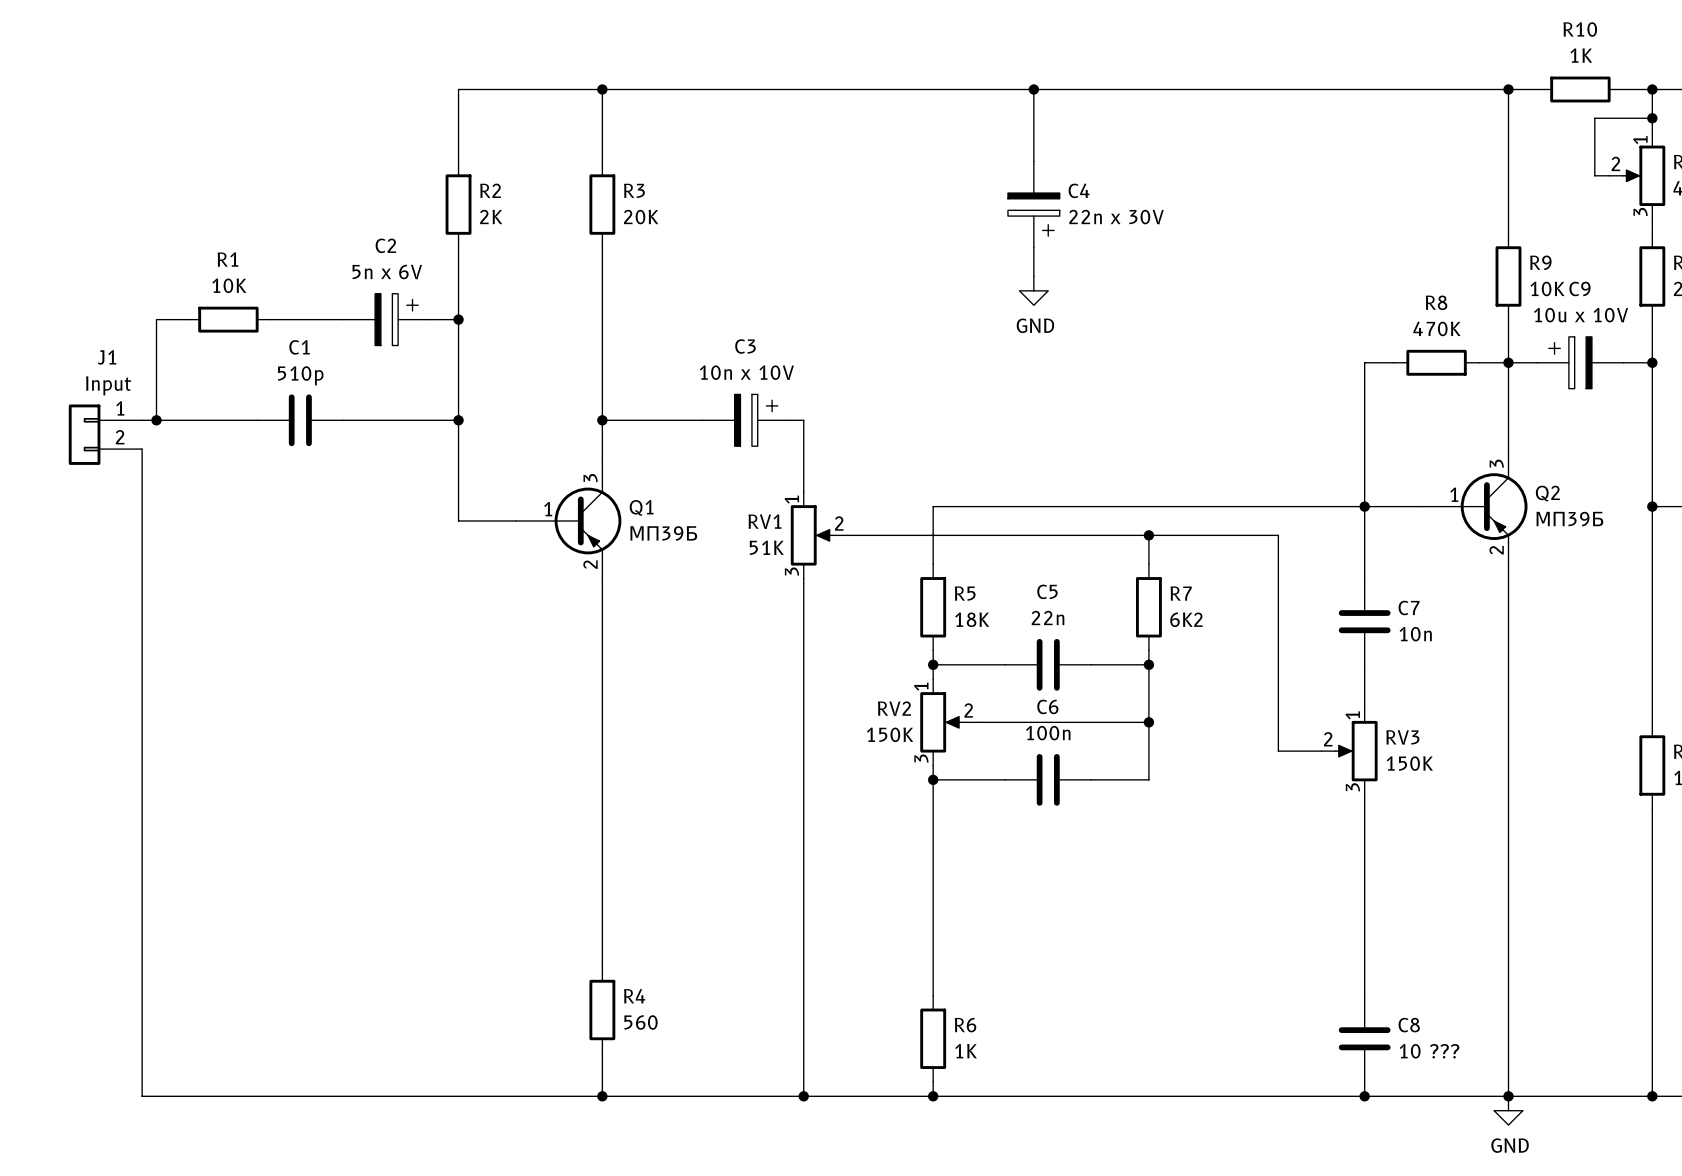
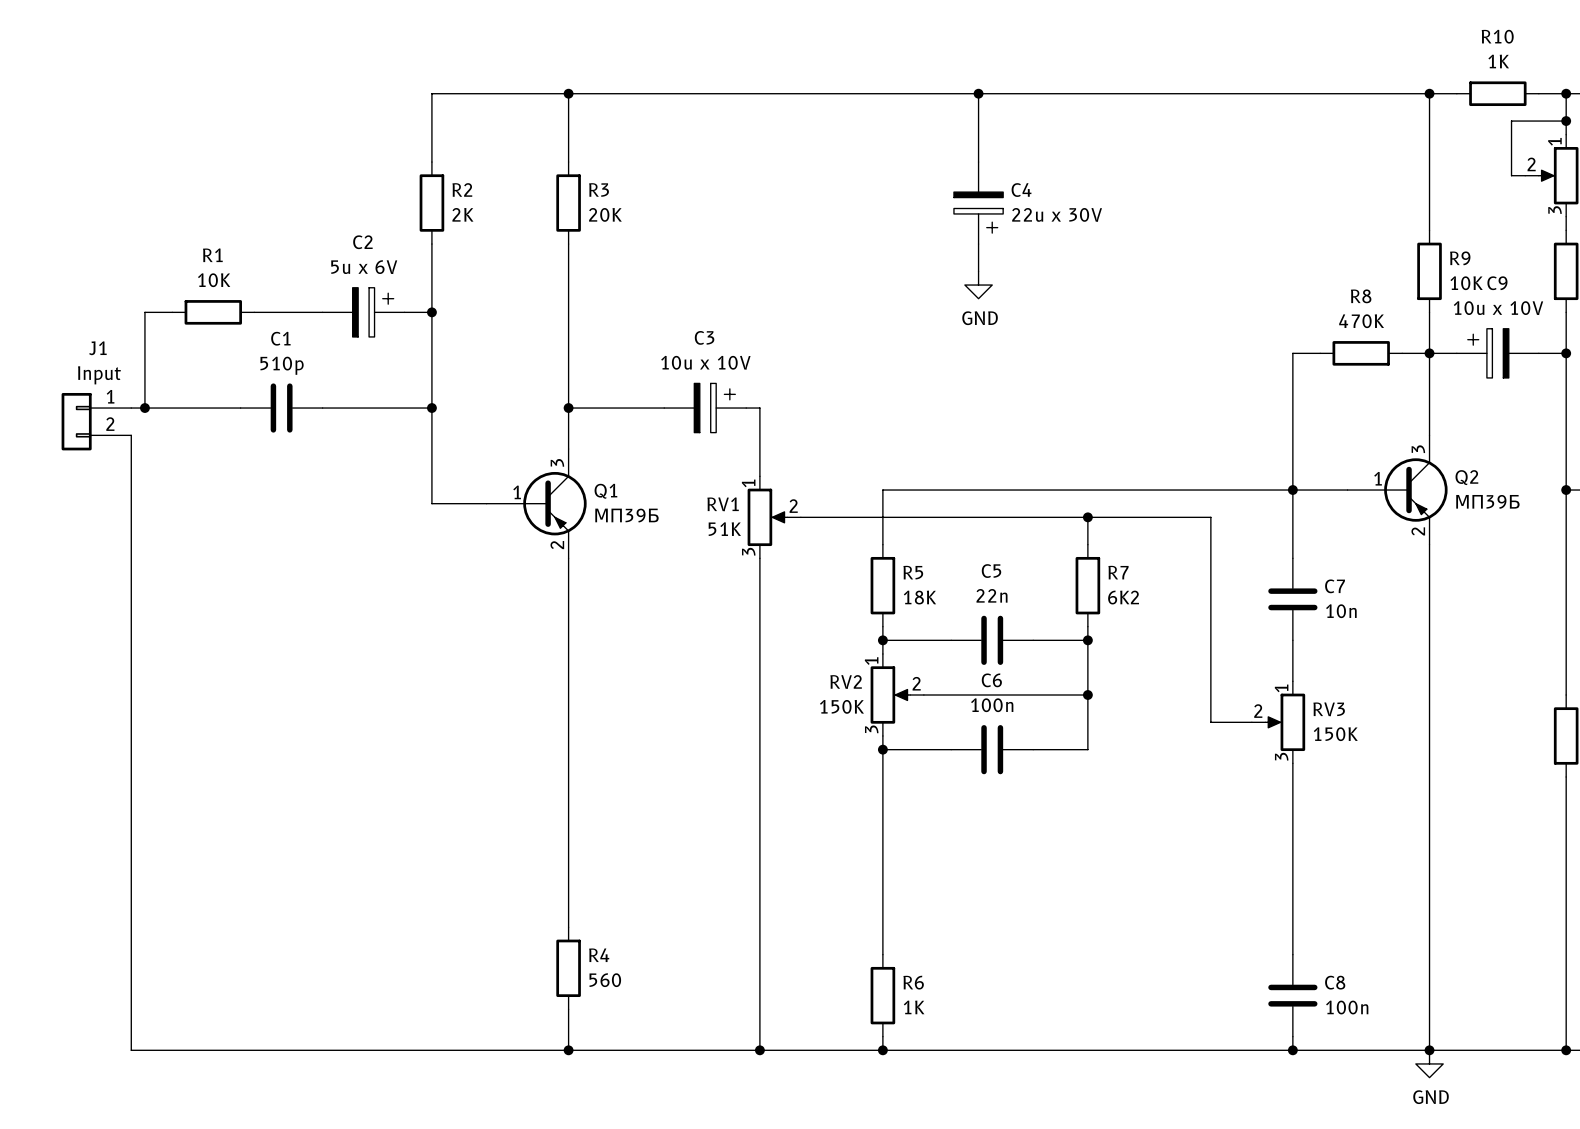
C4 value: 22n x 30V (1116, 217) -> 22u x 30V (1057, 214)
C2 value: 5n x 6V (387, 272) -> 5u x 6V (364, 267)
C3 value: 10n x 10V (746, 372) -> 10u x 10V (705, 362)
C8 value: 10 ??? (1429, 1051) -> 100n (1347, 1007)

